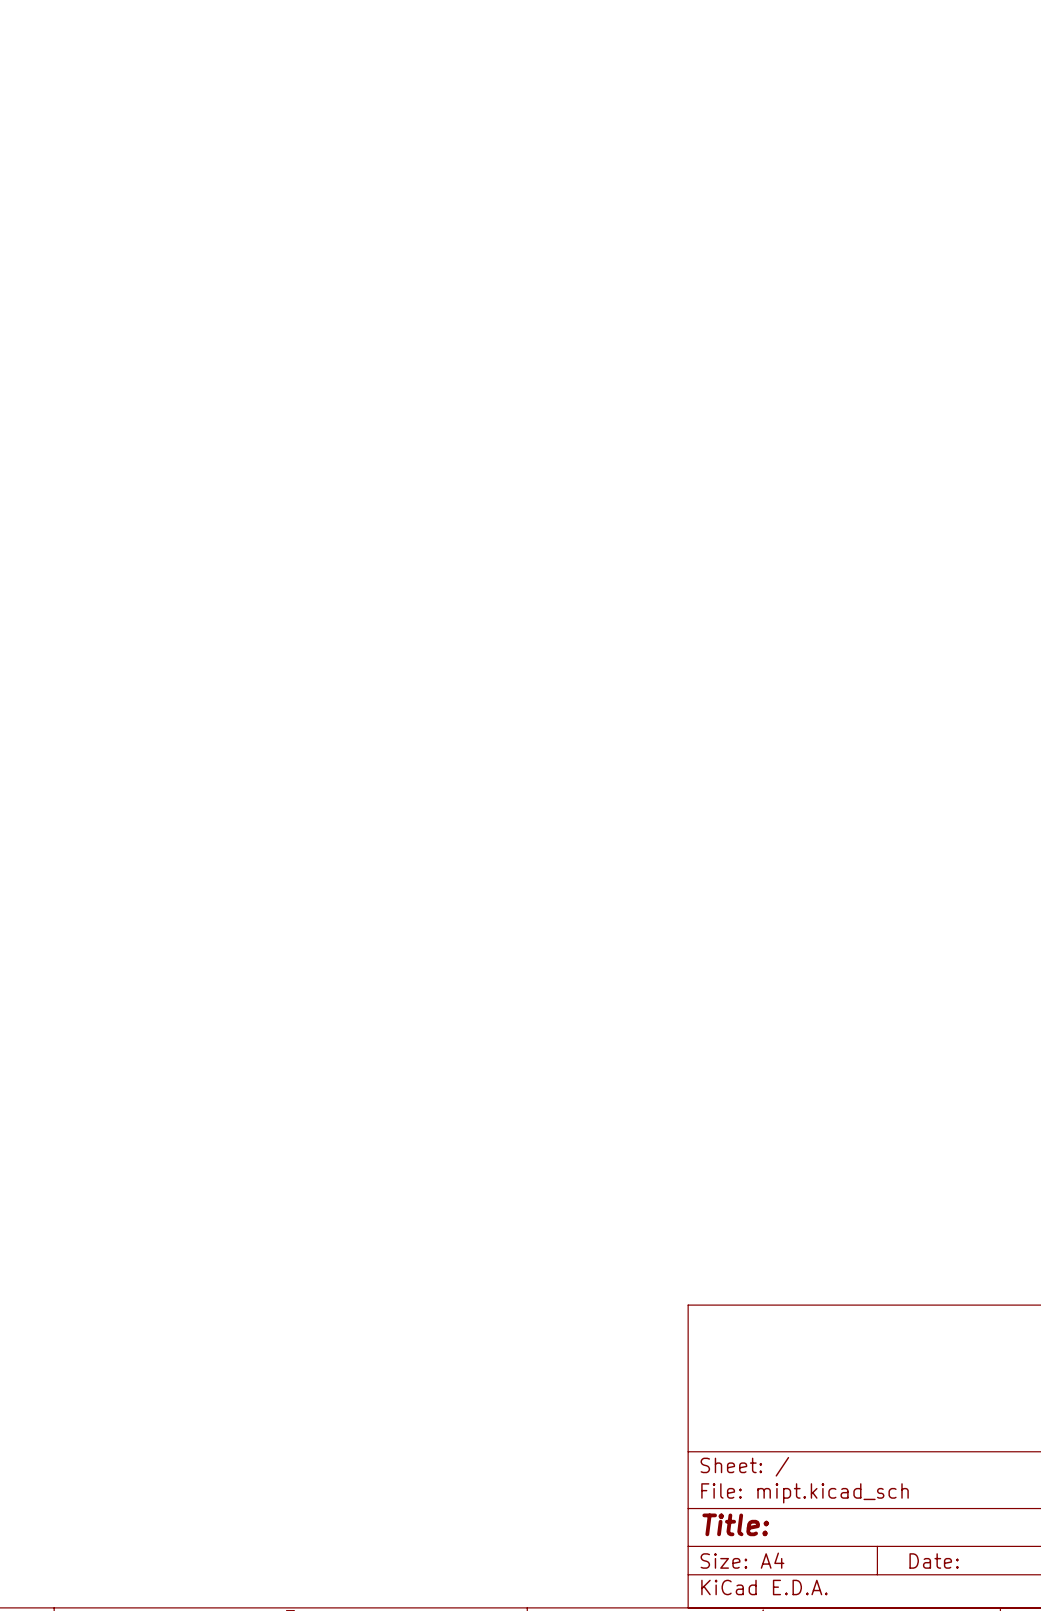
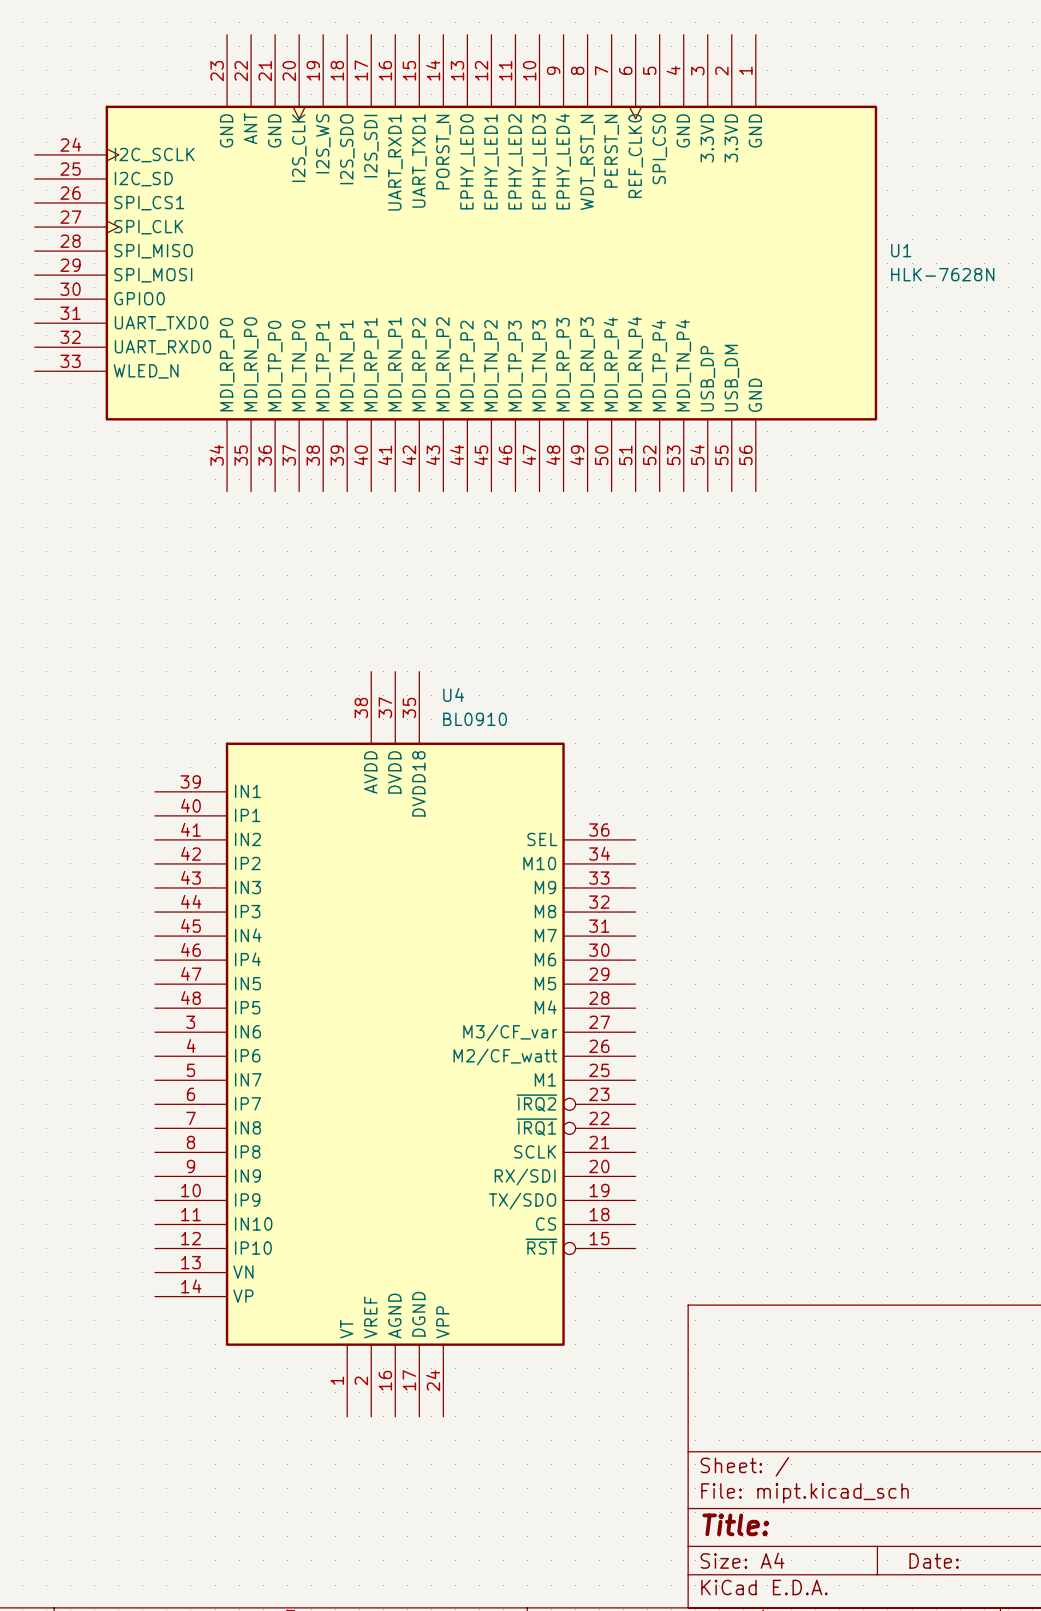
U1: none -> HLK-7628N (455, 263)
U4: none -> BL0910 (395, 1044)

